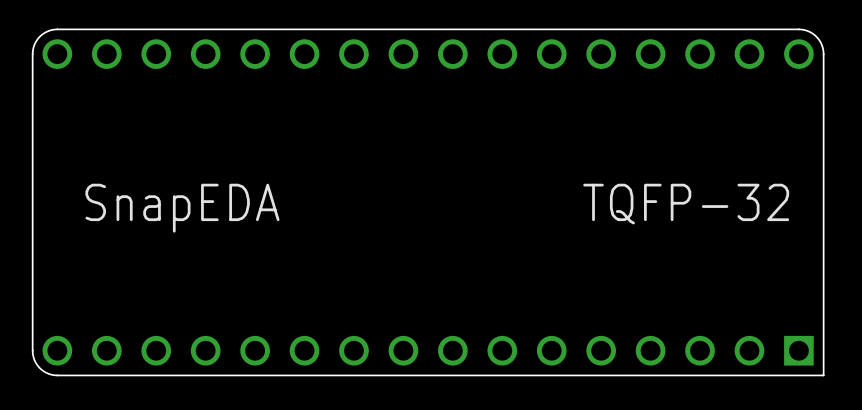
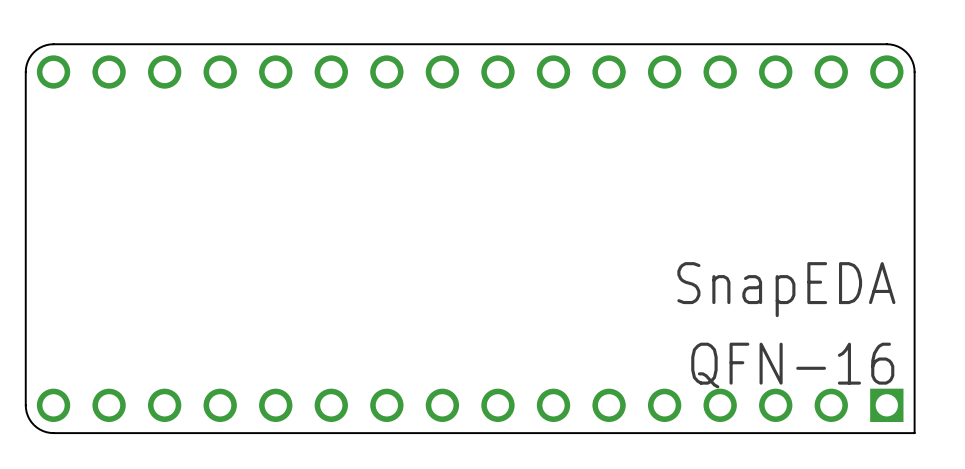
text: TQFP-32 (686, 204) -> none
text position: SnapEDA (182, 208) -> SnapEDA (786, 289)
text: none -> QFN-16 (792, 365)

